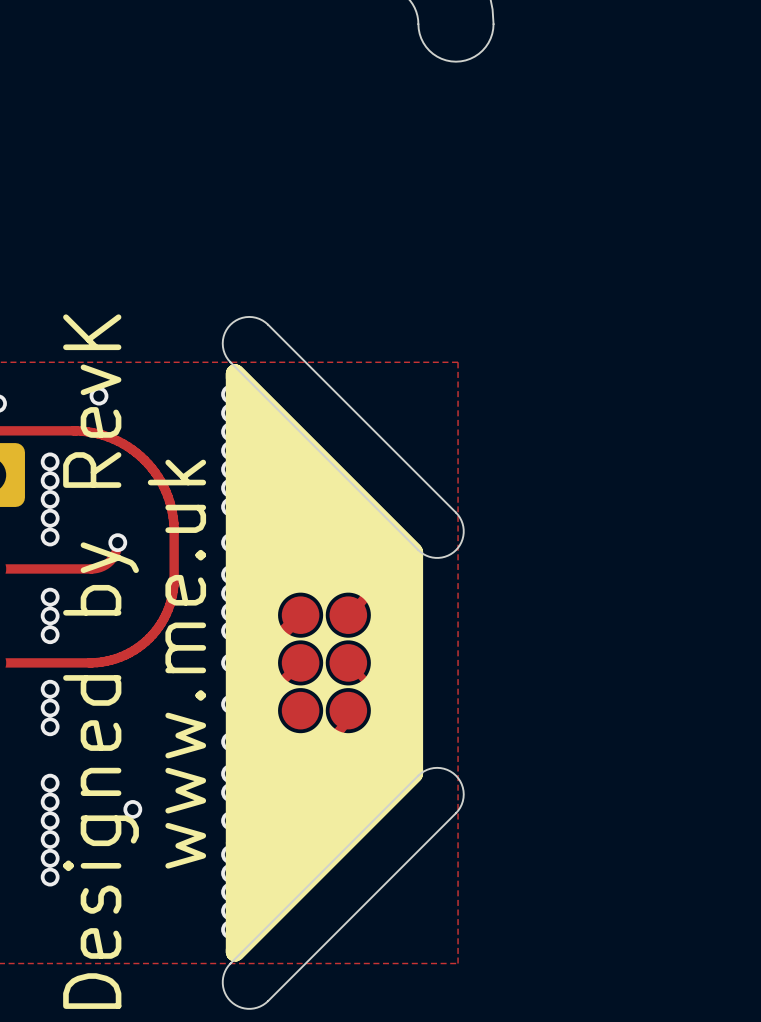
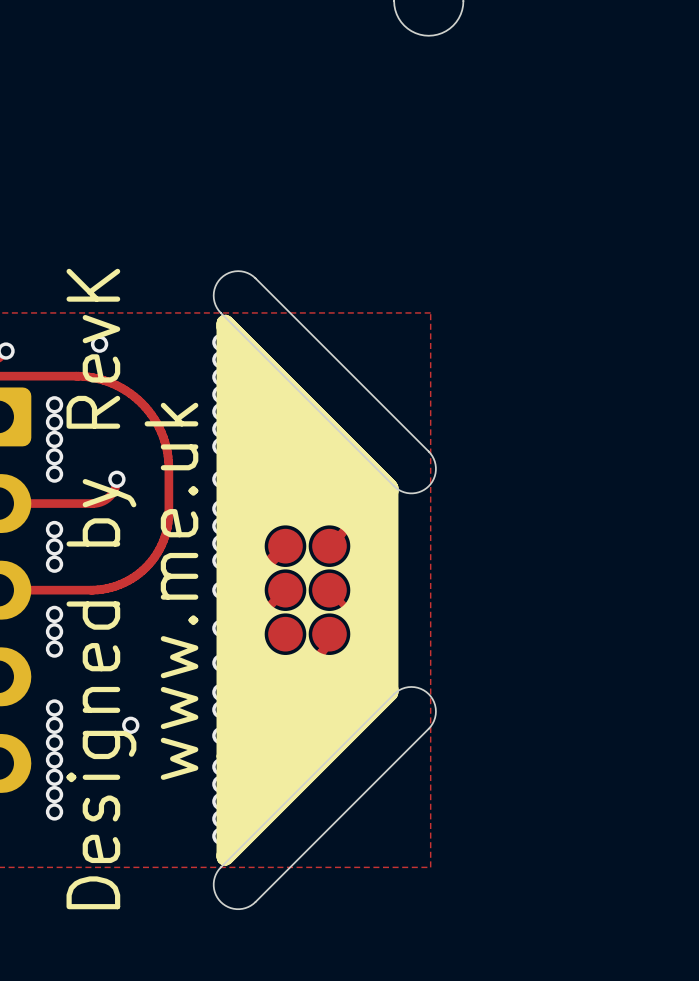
via: (50, 783) -> none
via: none -> (54, 707)
via: (50, 801) -> none
via: none -> (54, 725)
via: (50, 820) -> none
via: none -> (54, 742)
via: (50, 839) -> none
via: none -> (54, 759)
via: (50, 858) -> none
via: none -> (54, 777)
via: (50, 877) -> none
via: none -> (54, 794)
via: none -> (54, 811)

